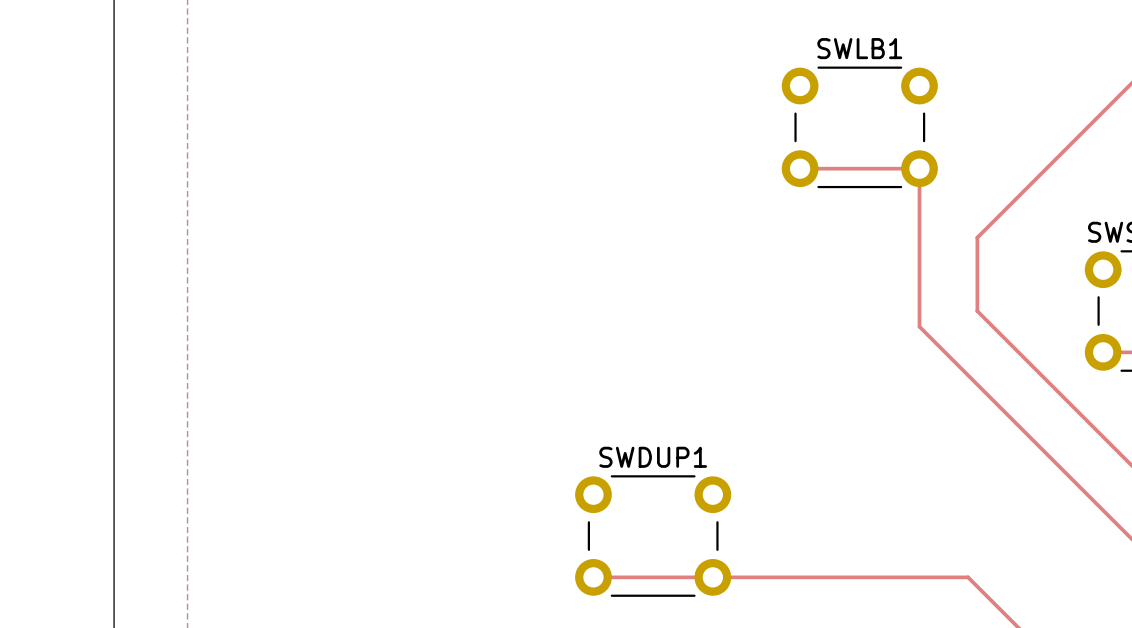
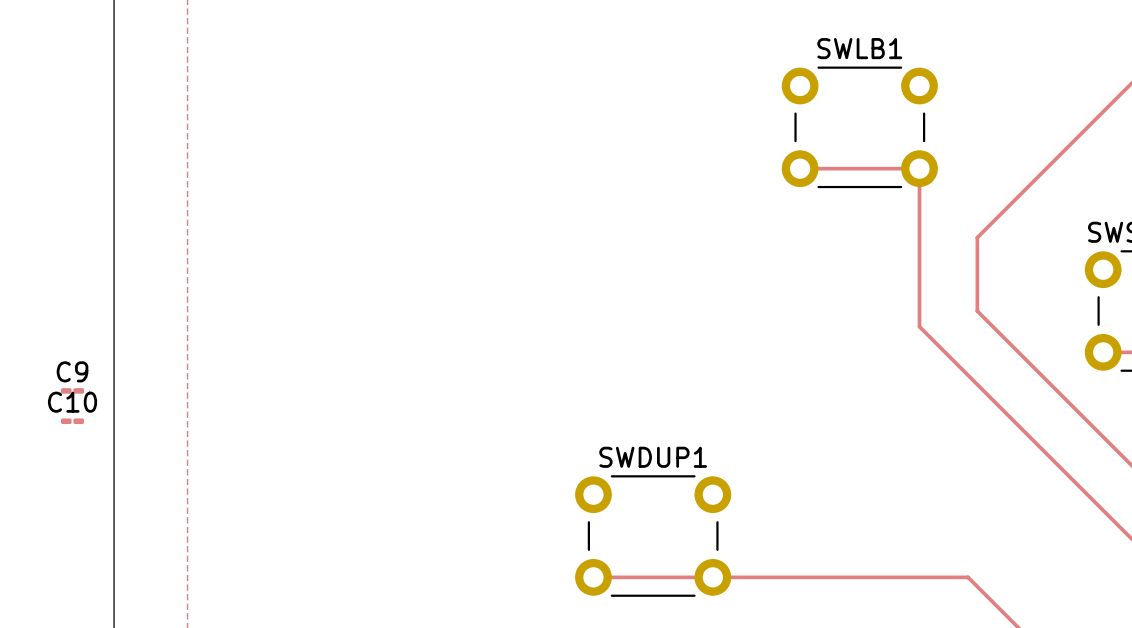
C9: none -> (72, 390)
C10: none -> (72, 421)

